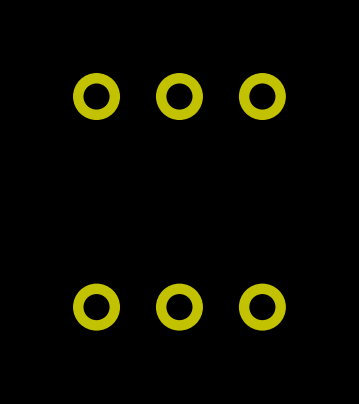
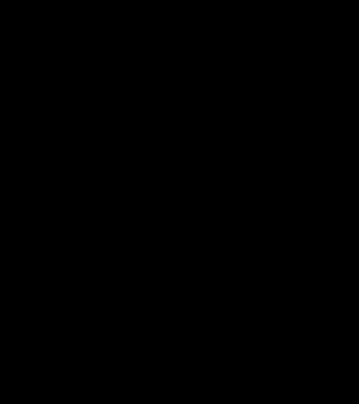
part: (179, 96) -> none
part: (179, 307) -> none

